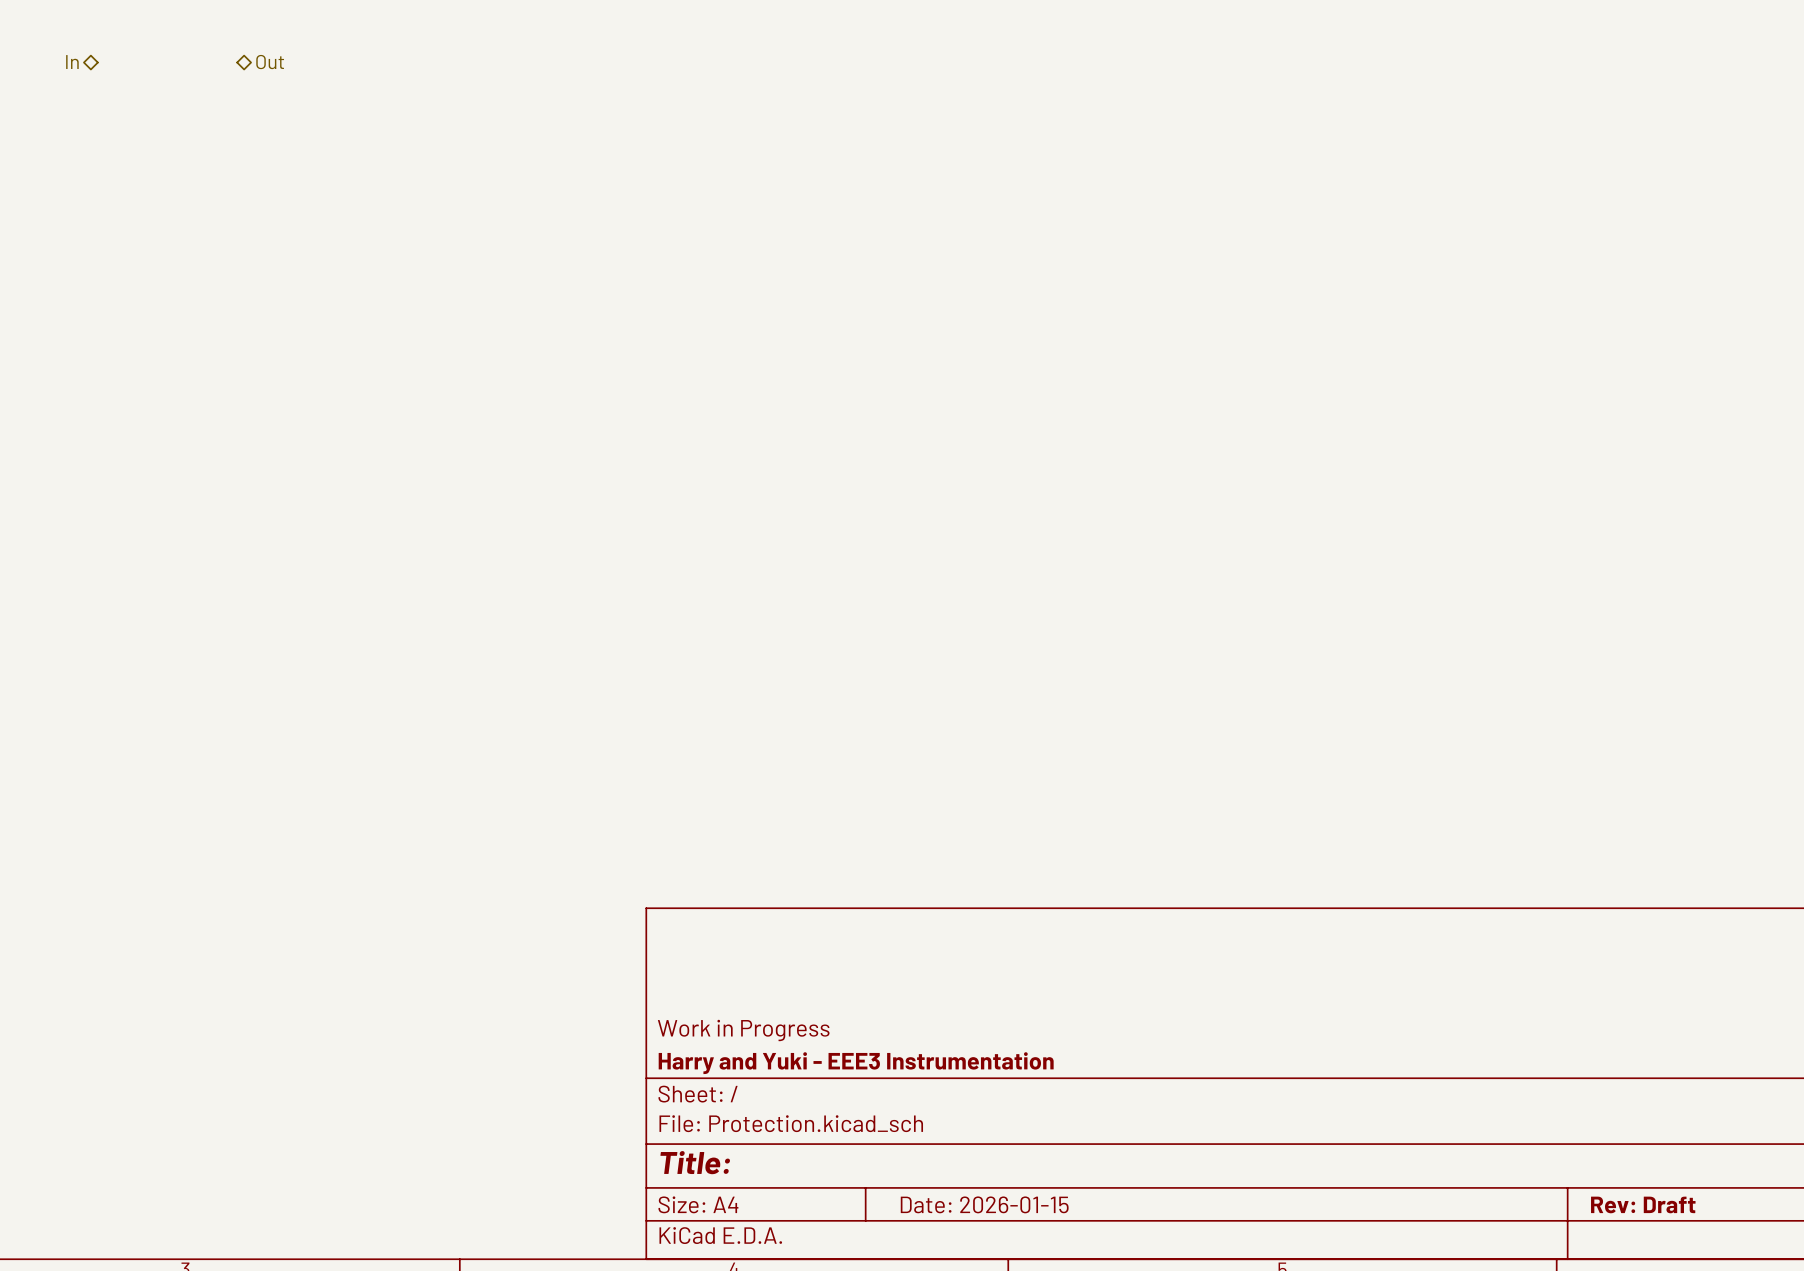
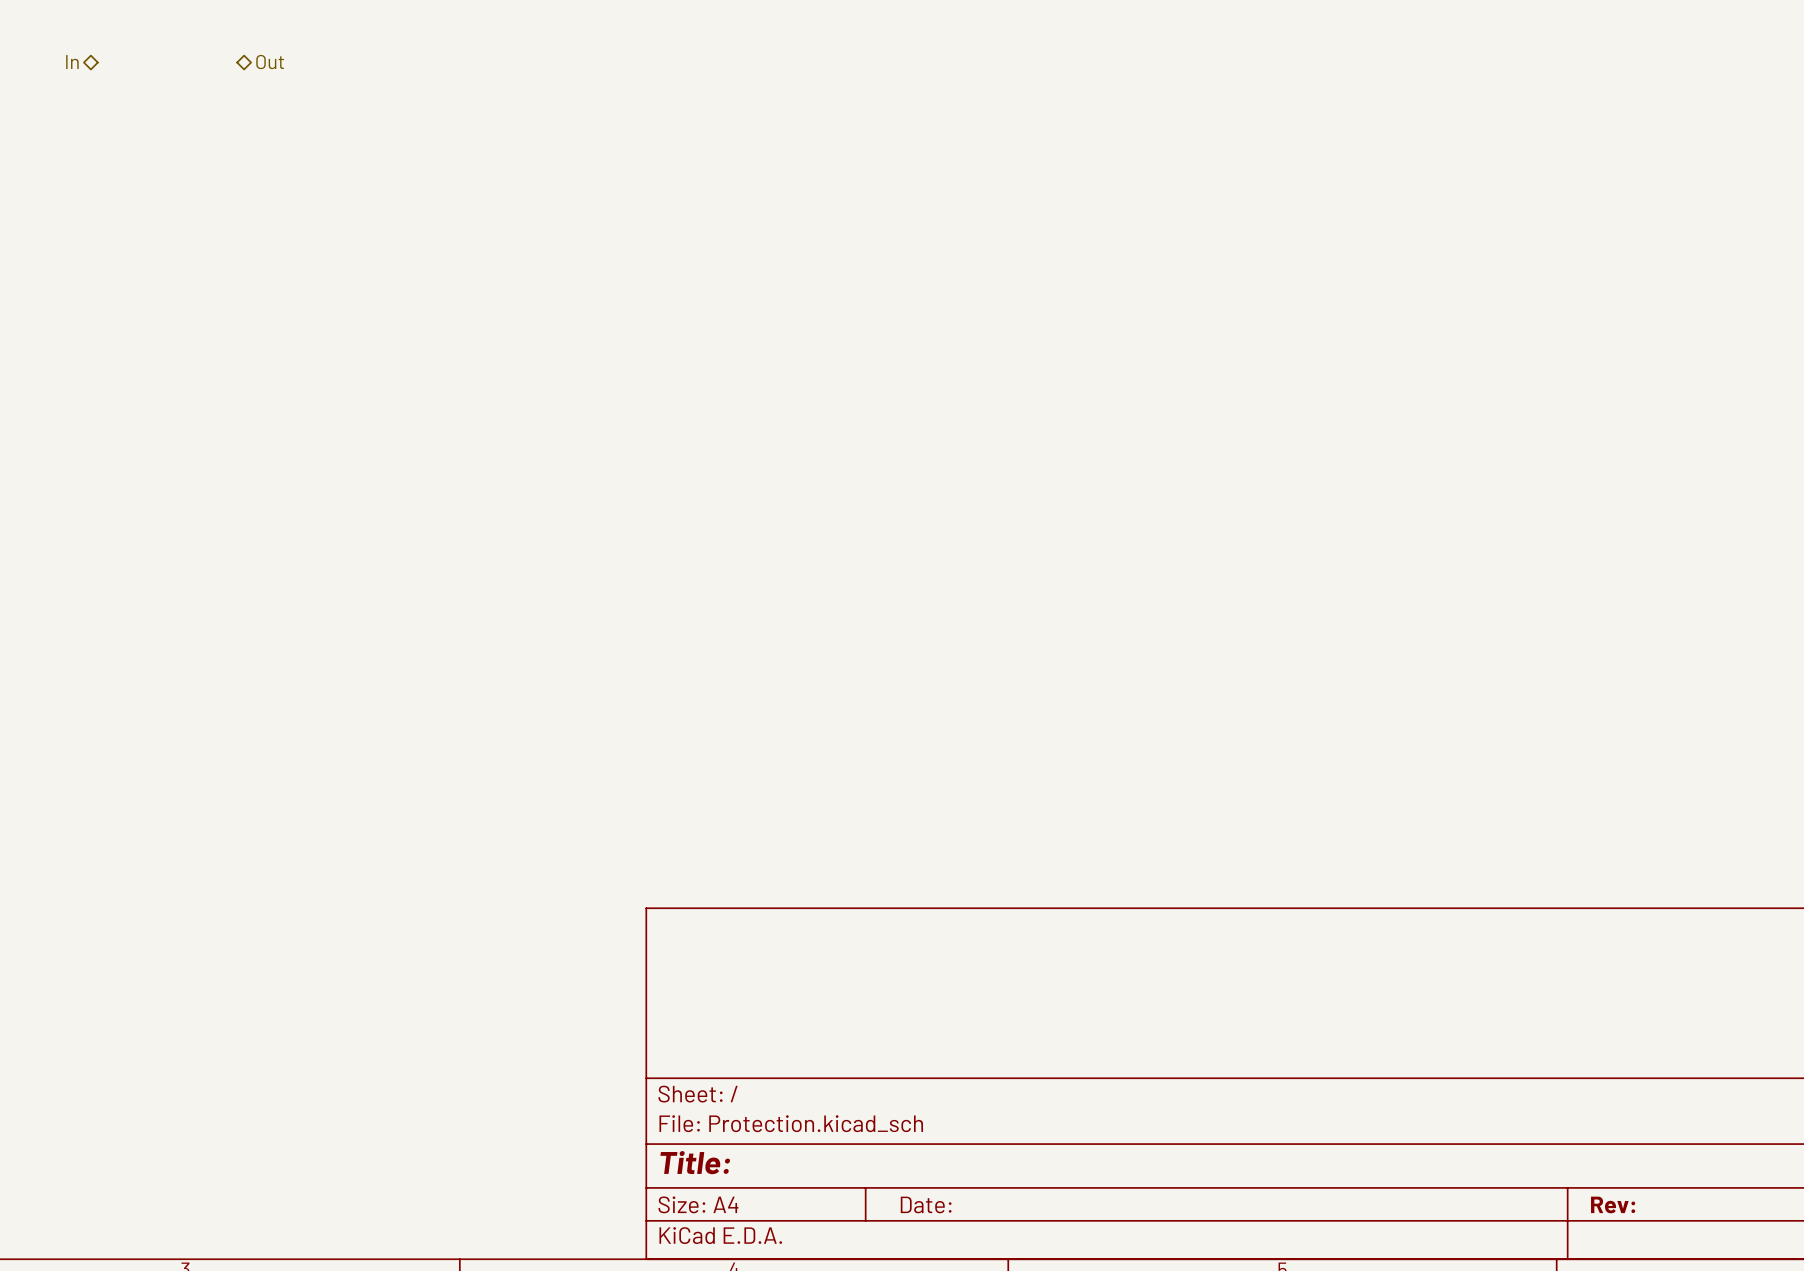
title block: Work in Progress (743, 1030) -> none
title block: Harry and Yuki - EEE3 Instrumentation (856, 1063) -> none
title block: Date: 2026-01-15 (984, 1204) -> Date: (926, 1204)
title block: Rev: Draft (1643, 1204) -> Rev: (1613, 1204)

